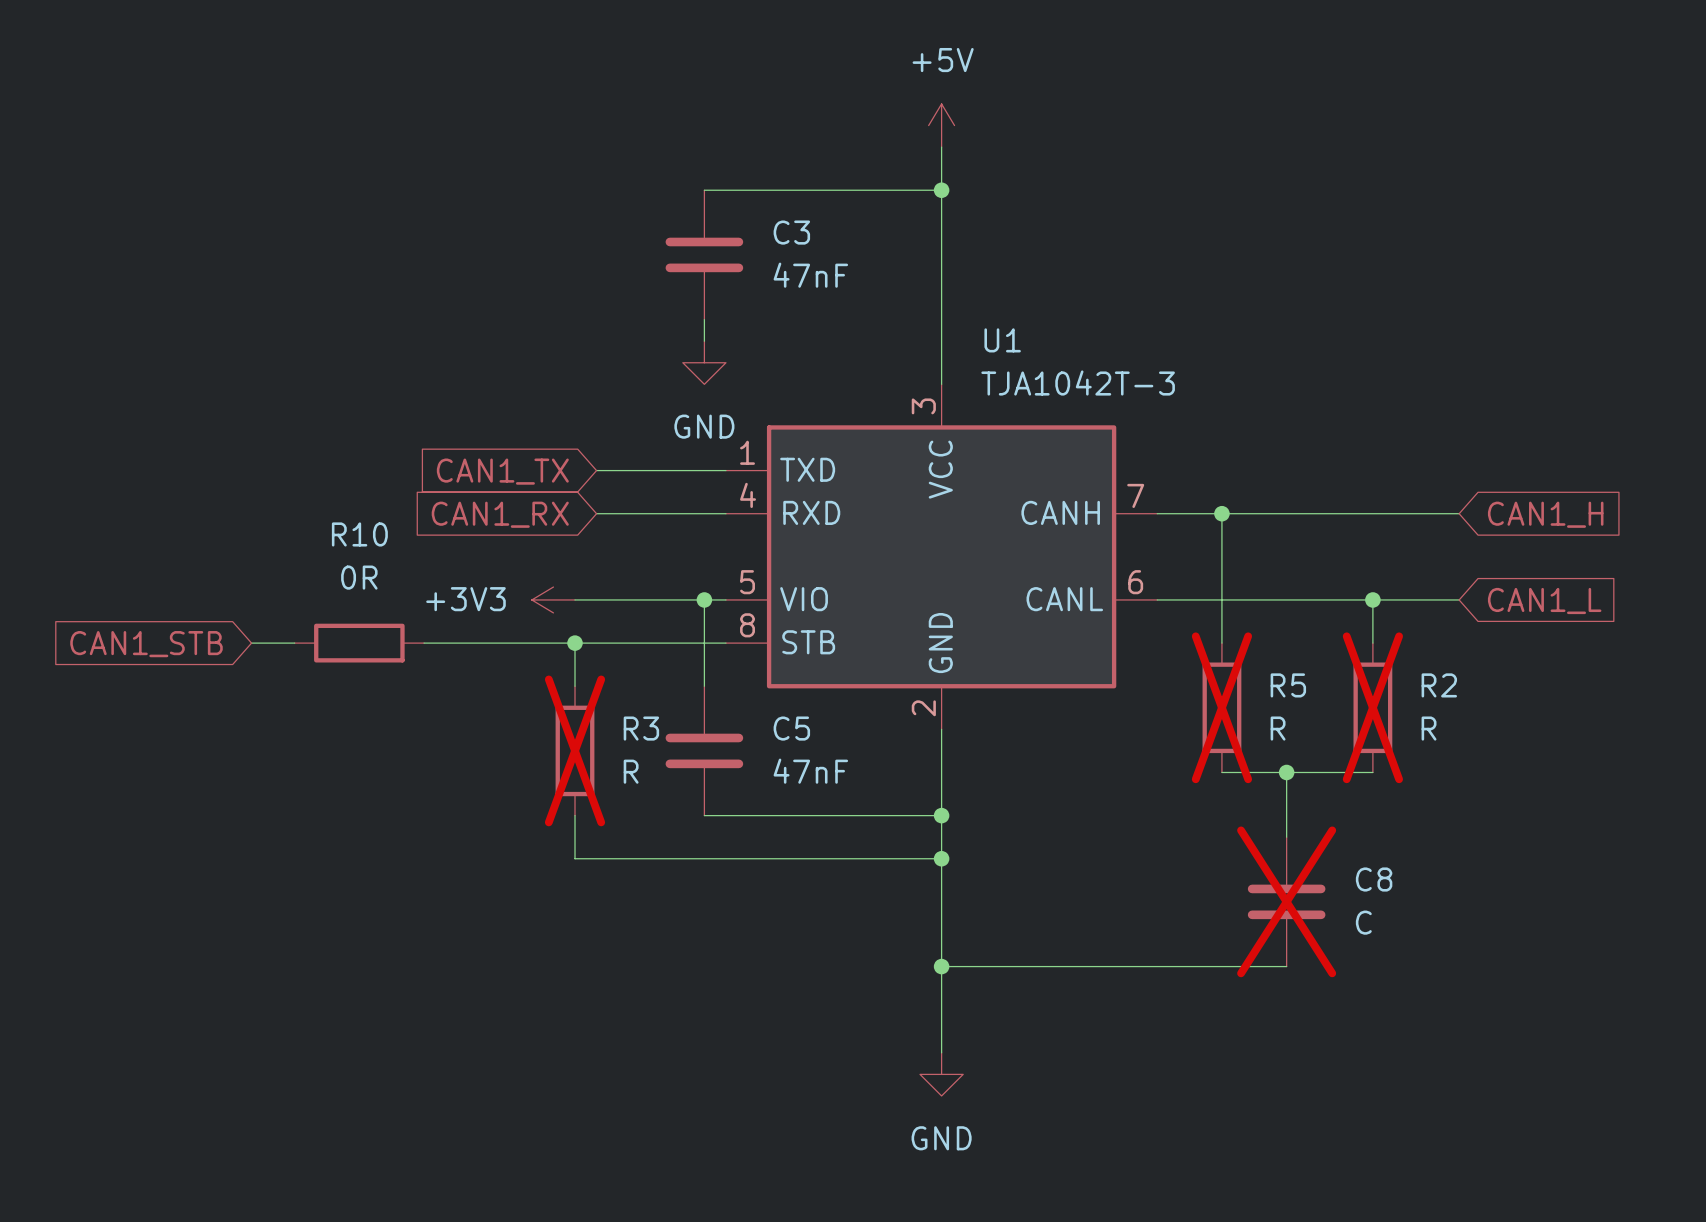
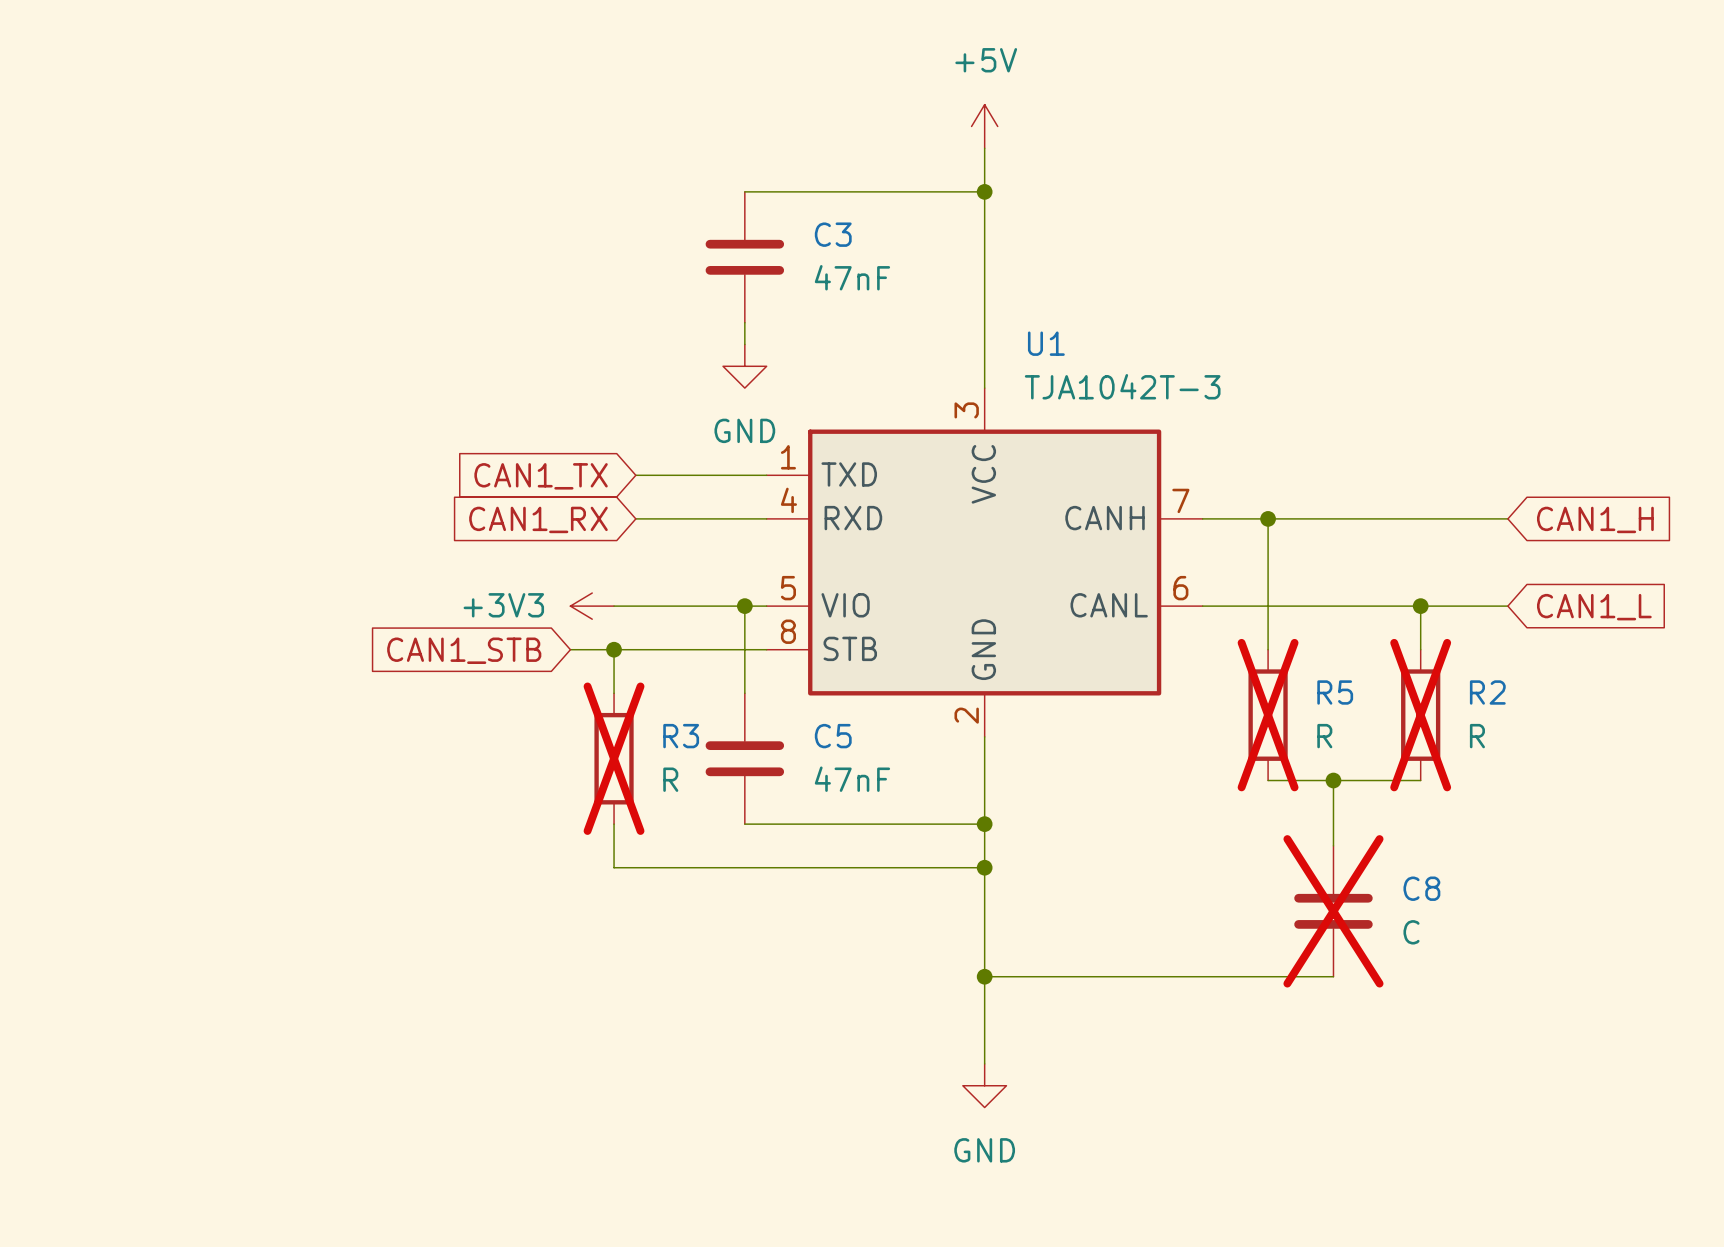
wire: (251, 643) (294, 643) -> none
R10: 0R (359, 643) -> none
wire: (424, 643) (531, 643) -> none
global label position: CAN1_STB (146, 644) -> CAN1_STB (464, 650)

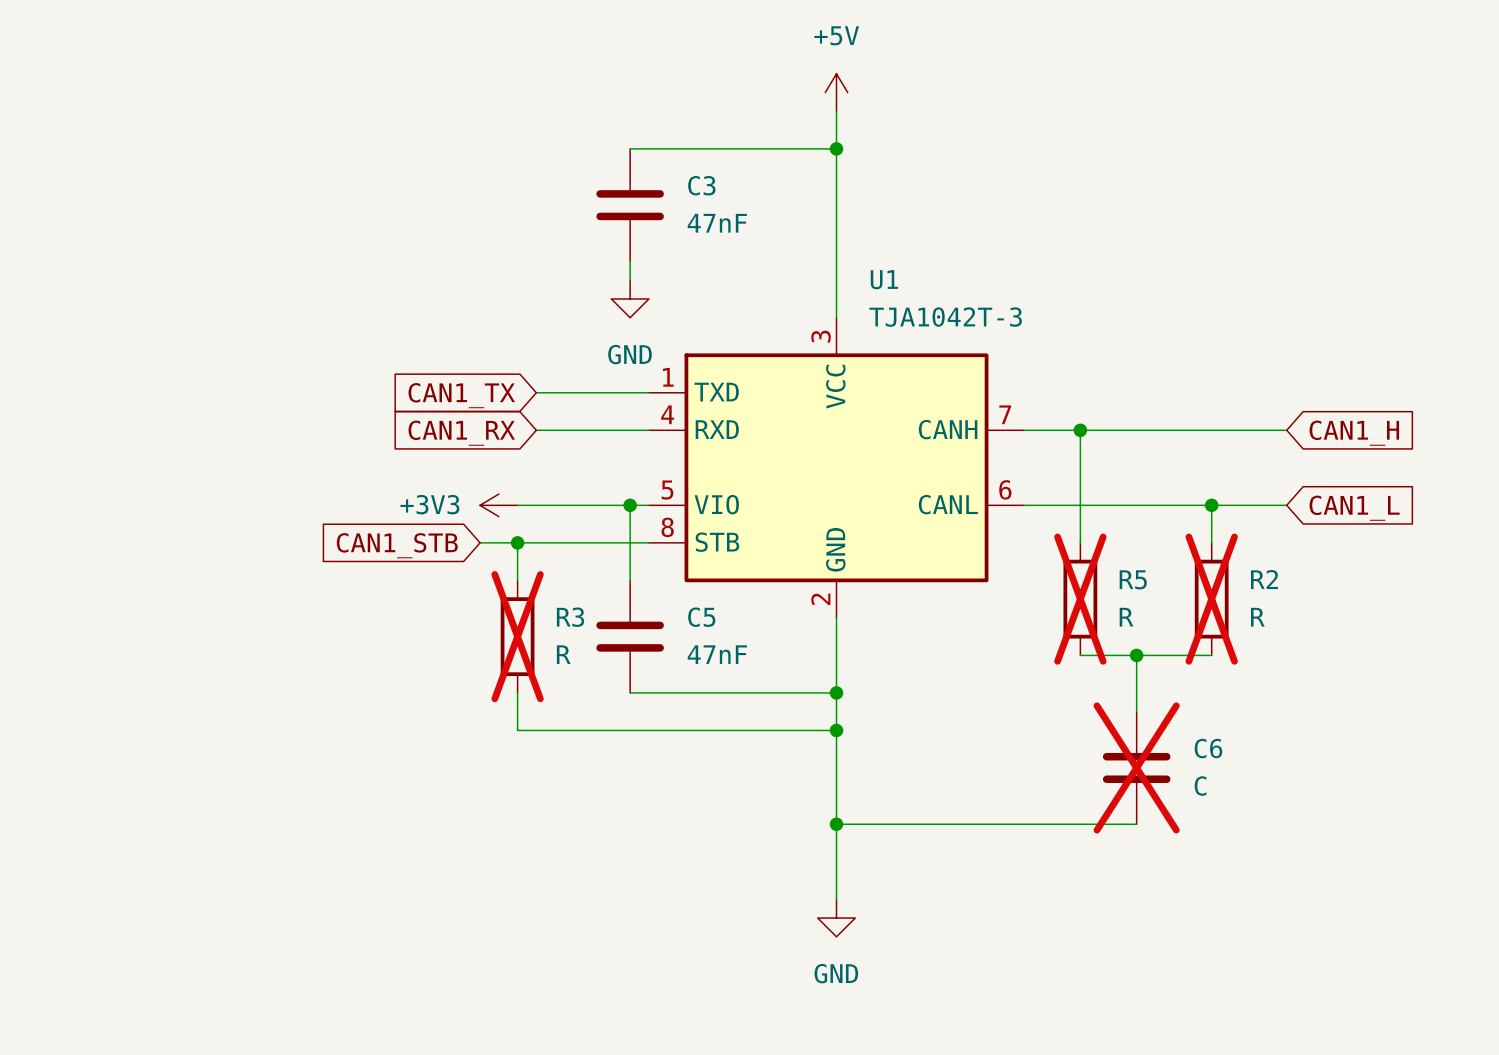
C8 name: C8 (1421, 888) -> C6 (1208, 748)

